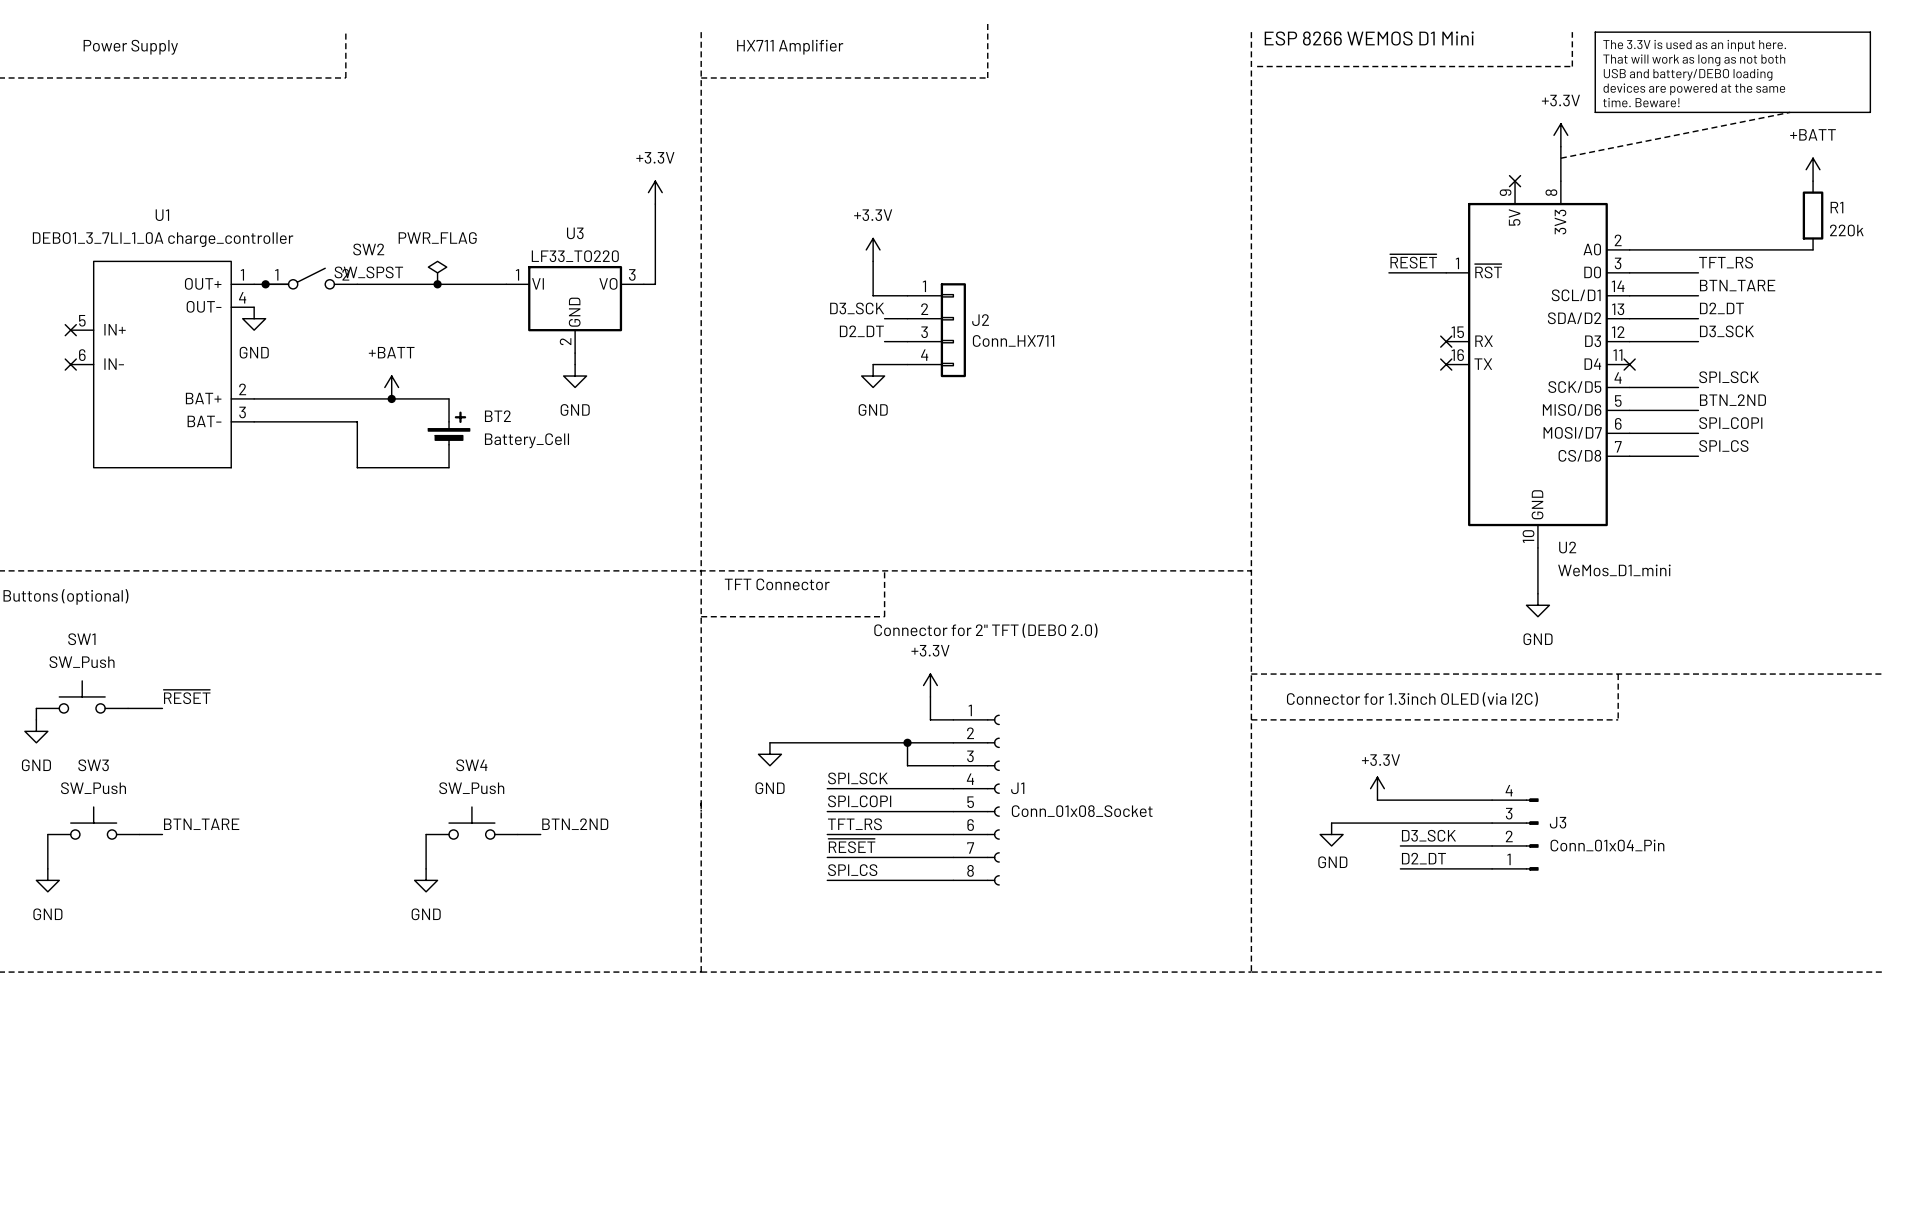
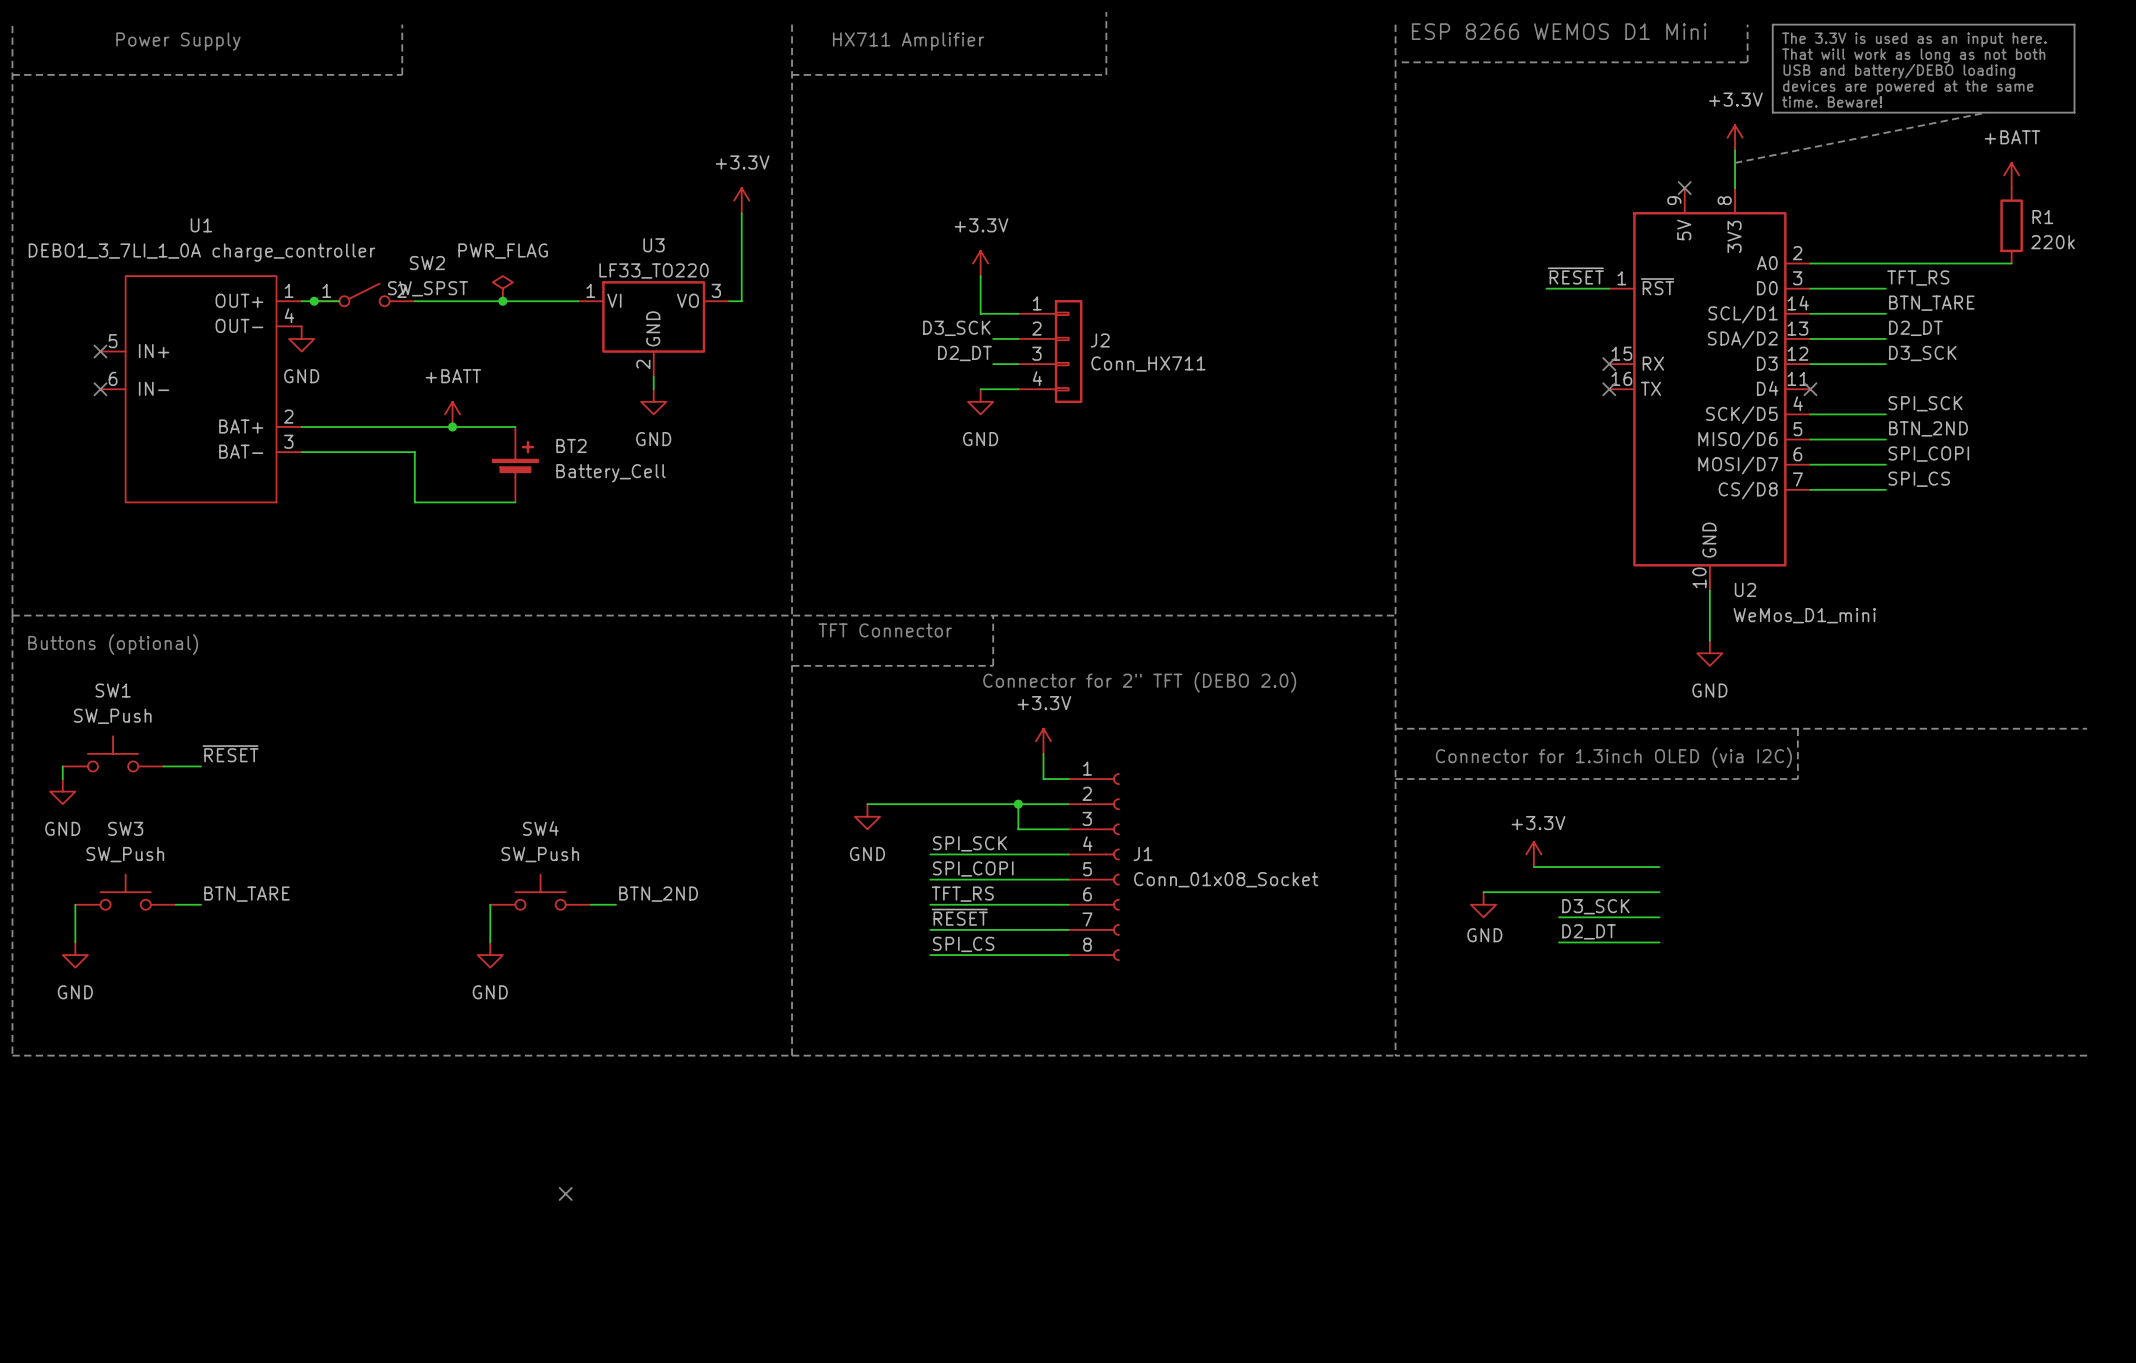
J3: Conn_01x04_Pin (1515, 834) -> none
no-connect mark: none -> (565, 1193)

